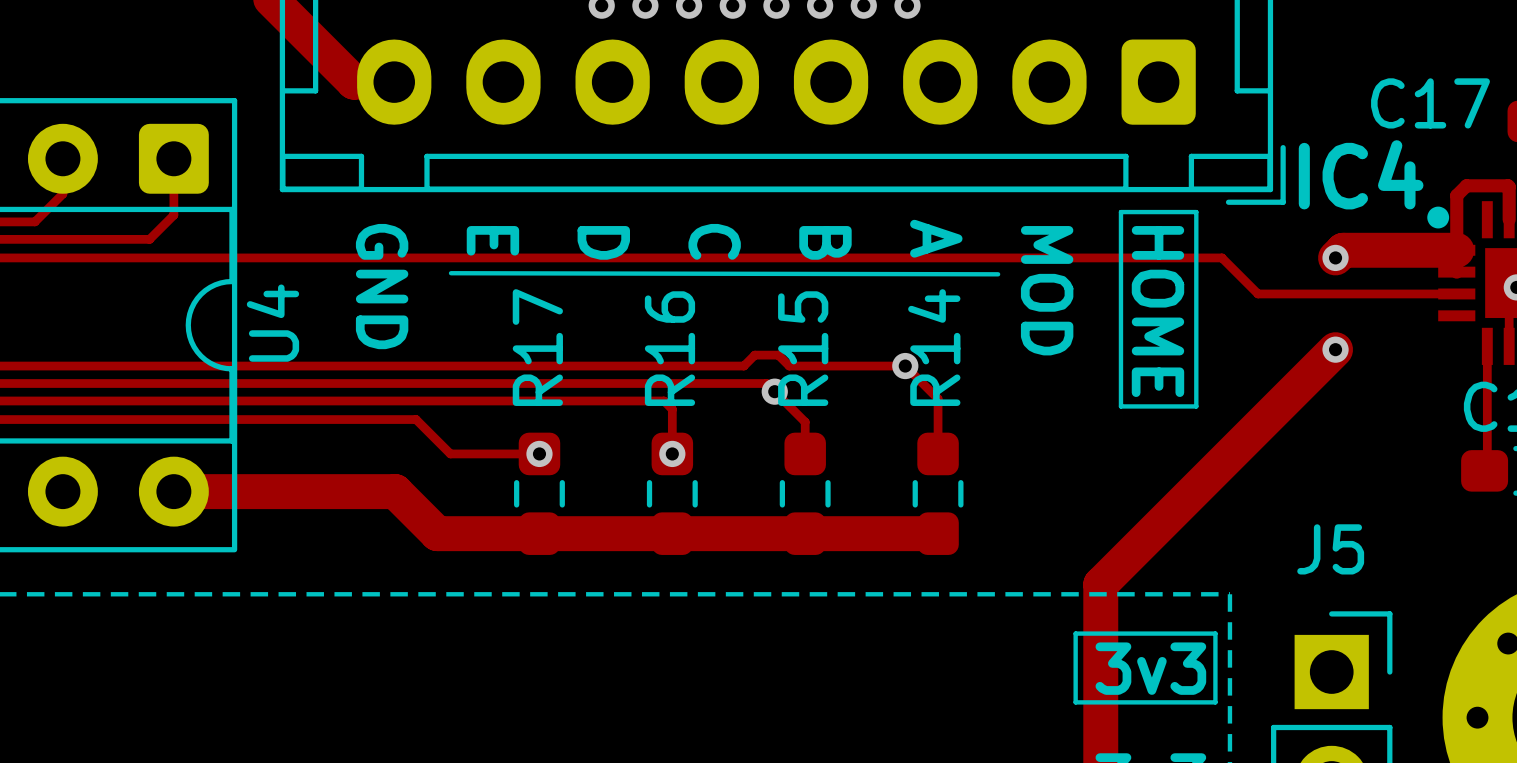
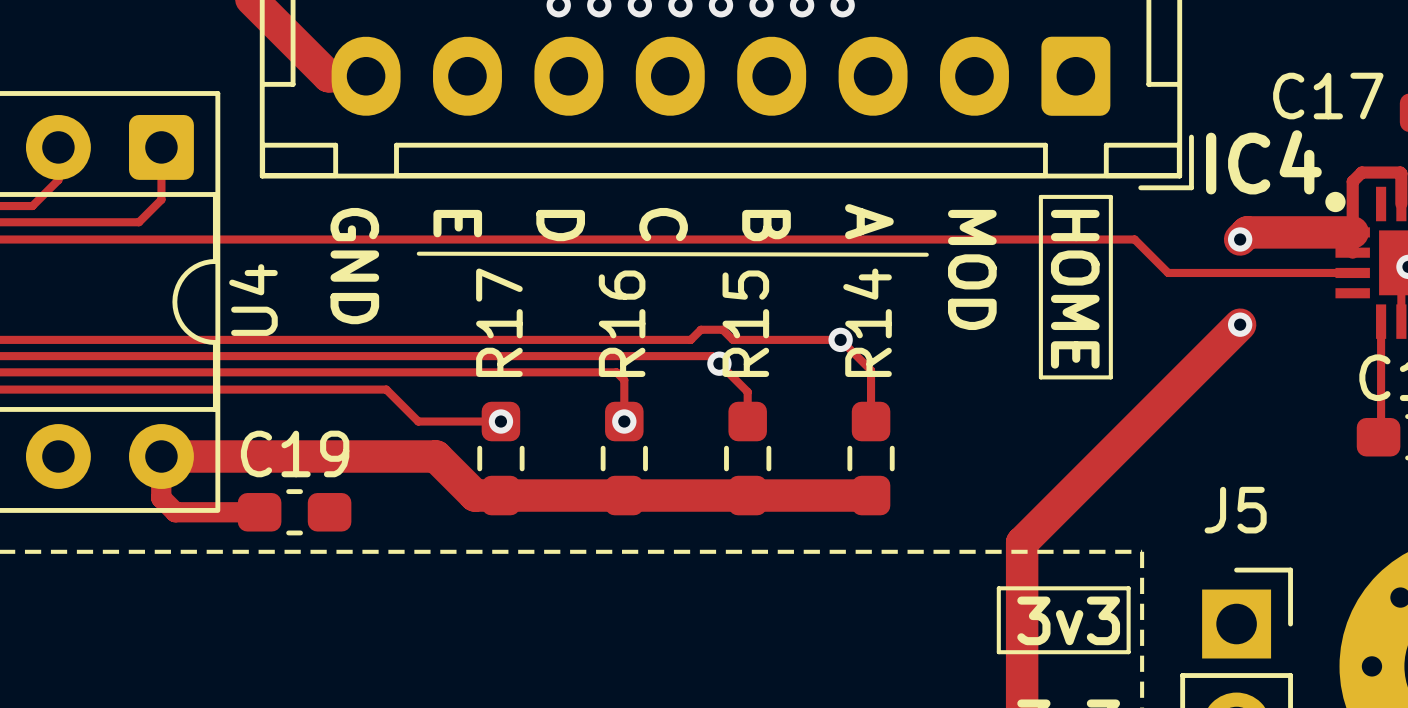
track: none -> (161, 456) (161, 498) (175, 512) (259, 512)
track: (395, 491) (437, 533) (511, 533) -> (367, 456) (436, 456) (475, 495)
C19: none -> (294, 512)

